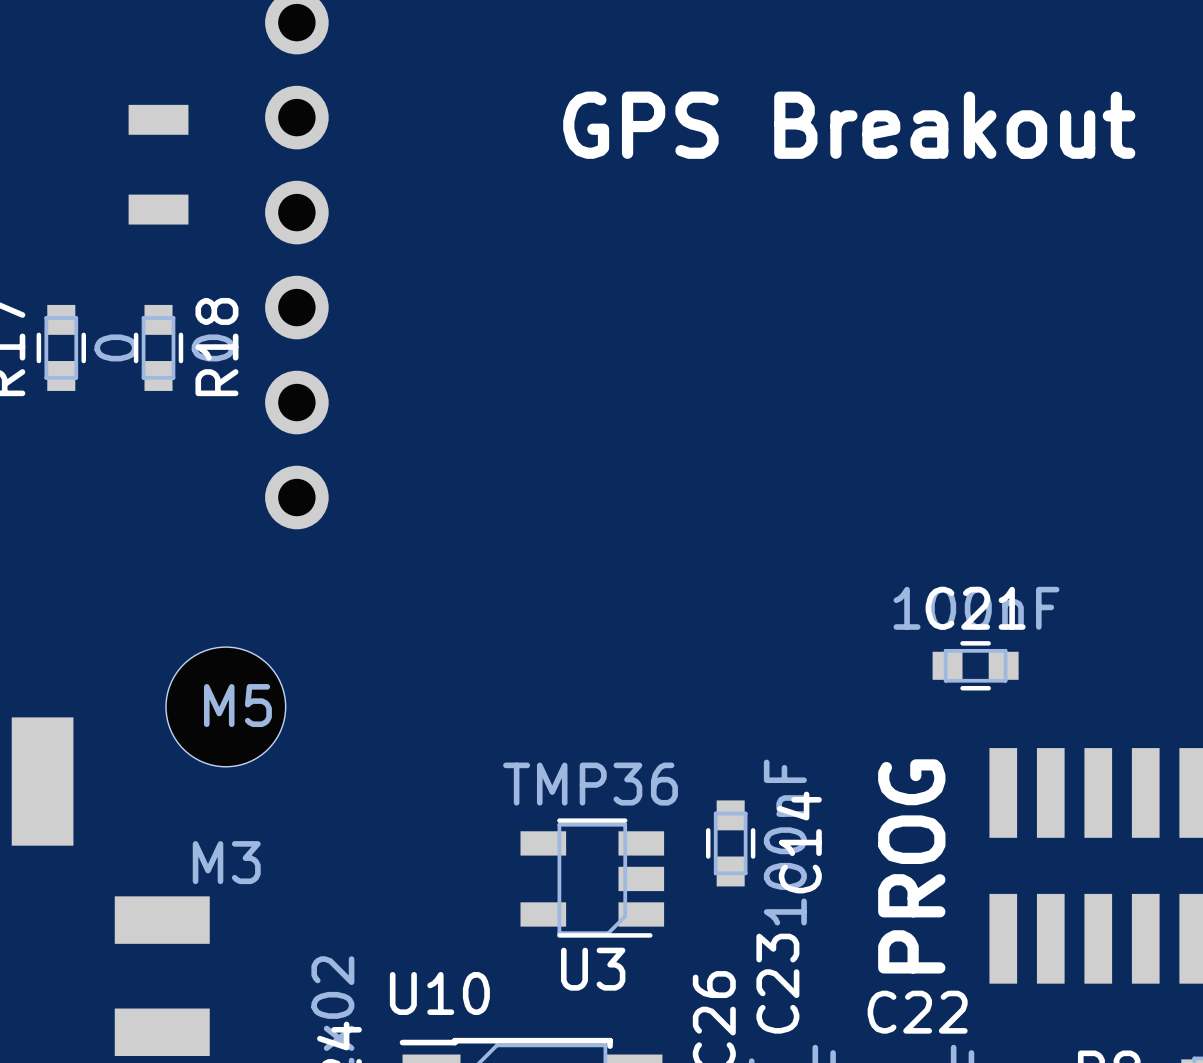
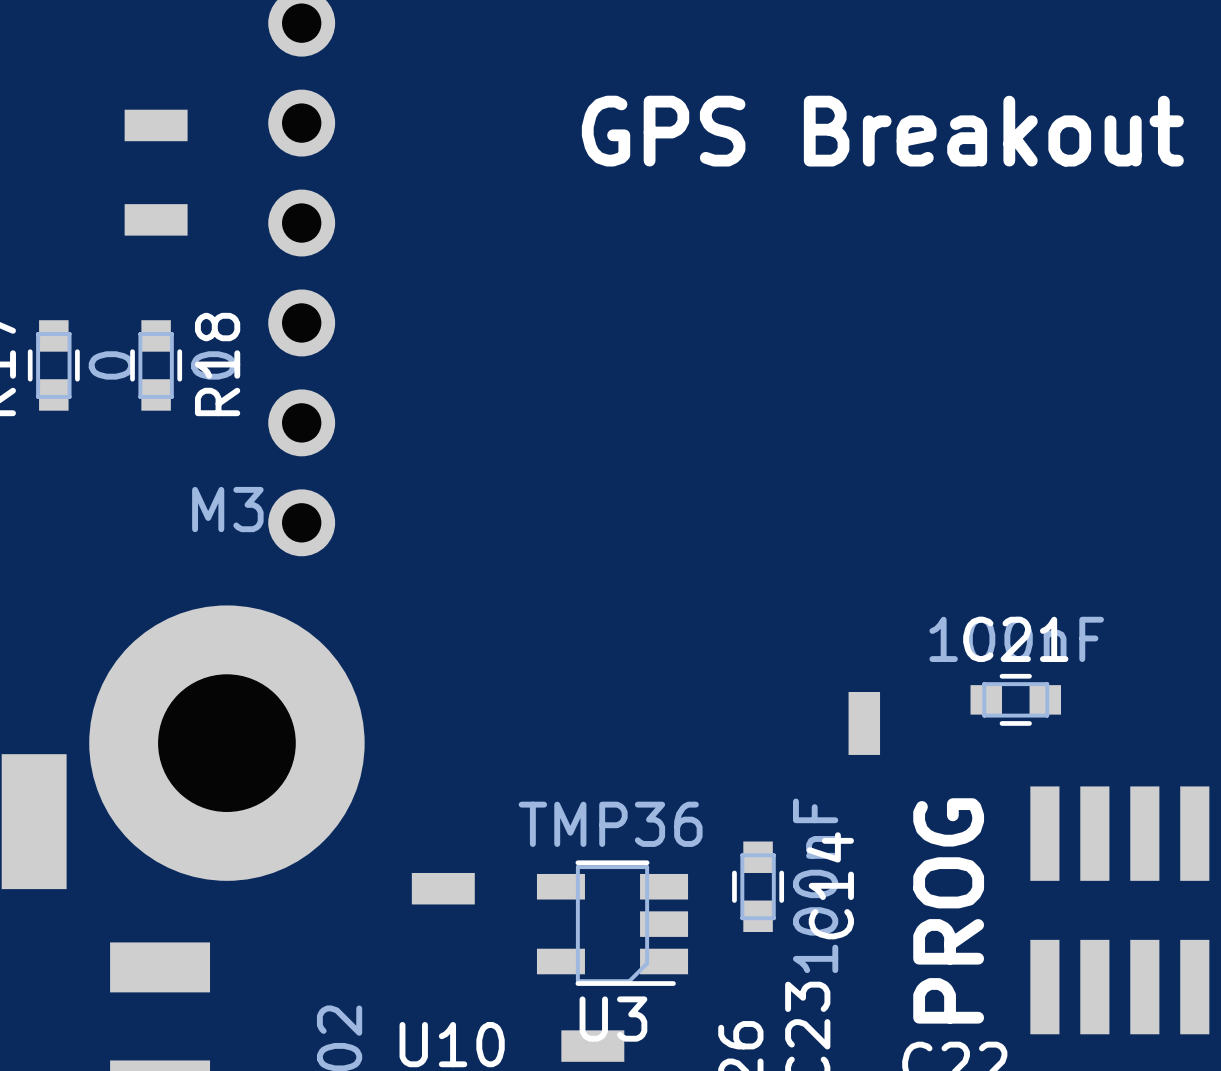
part: none -> (864, 723)
M5: M3 (225, 706) -> none
part: none -> M3 (226, 743)
part: none -> (443, 888)
part: none -> (592, 1046)

